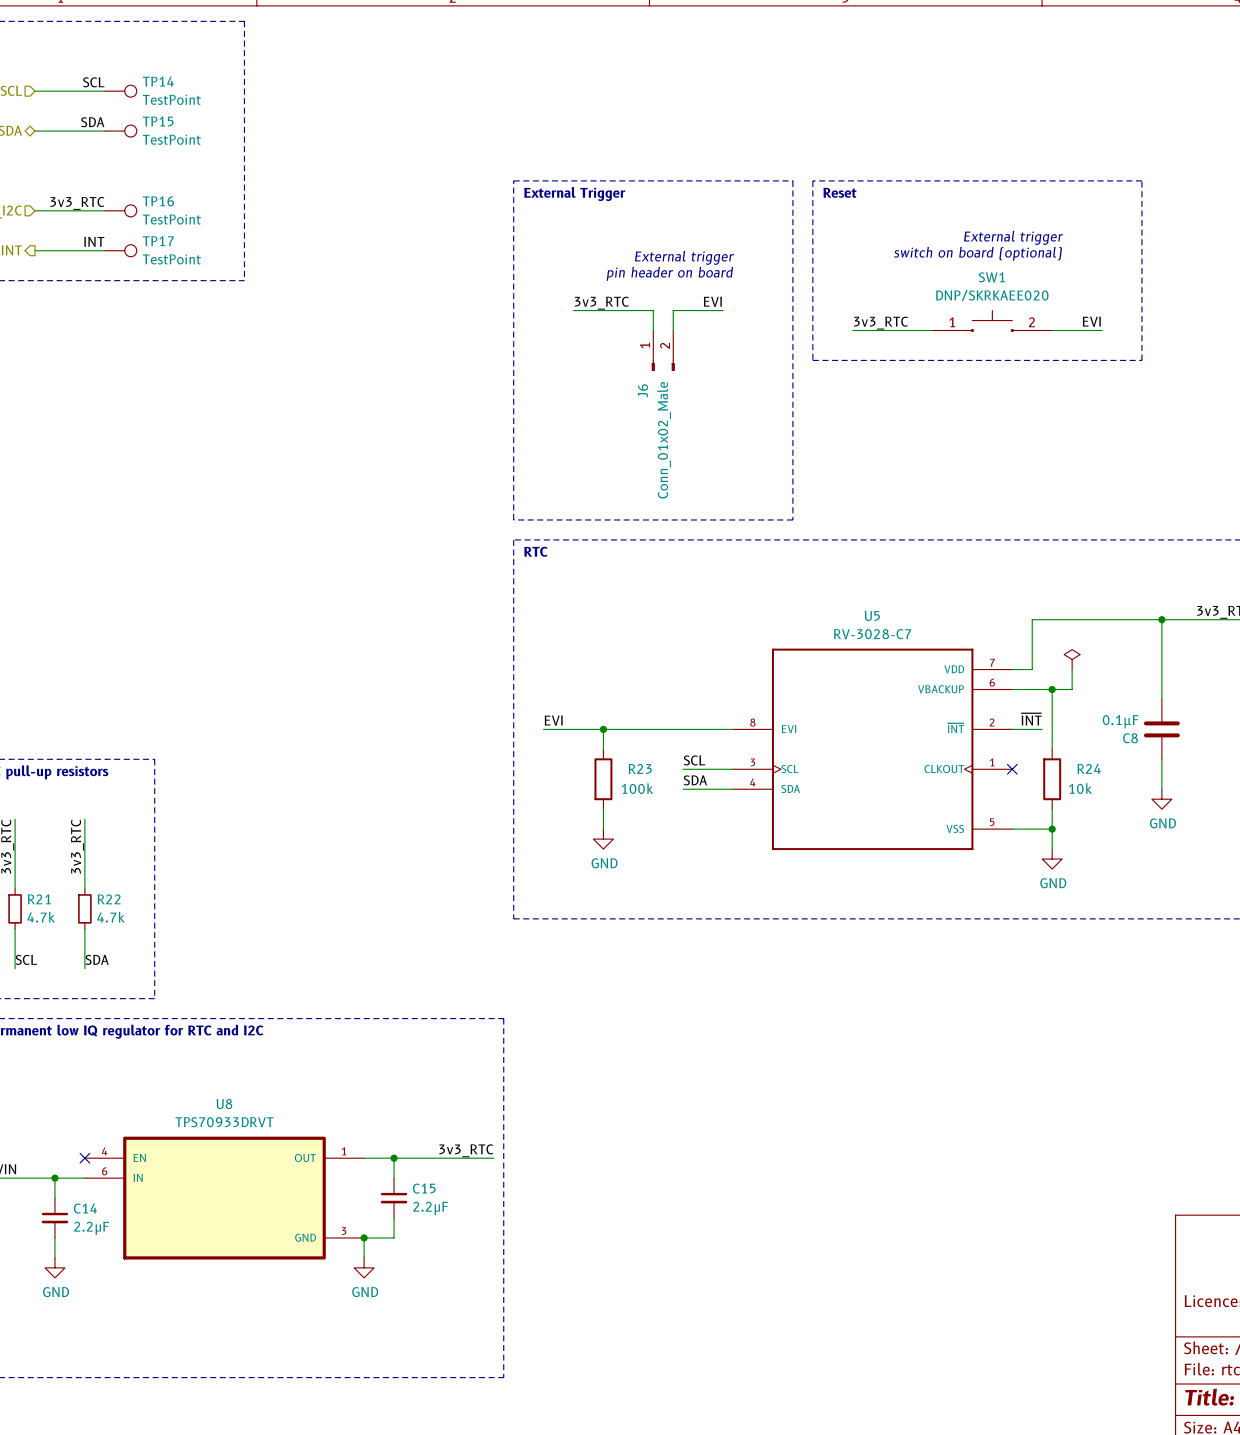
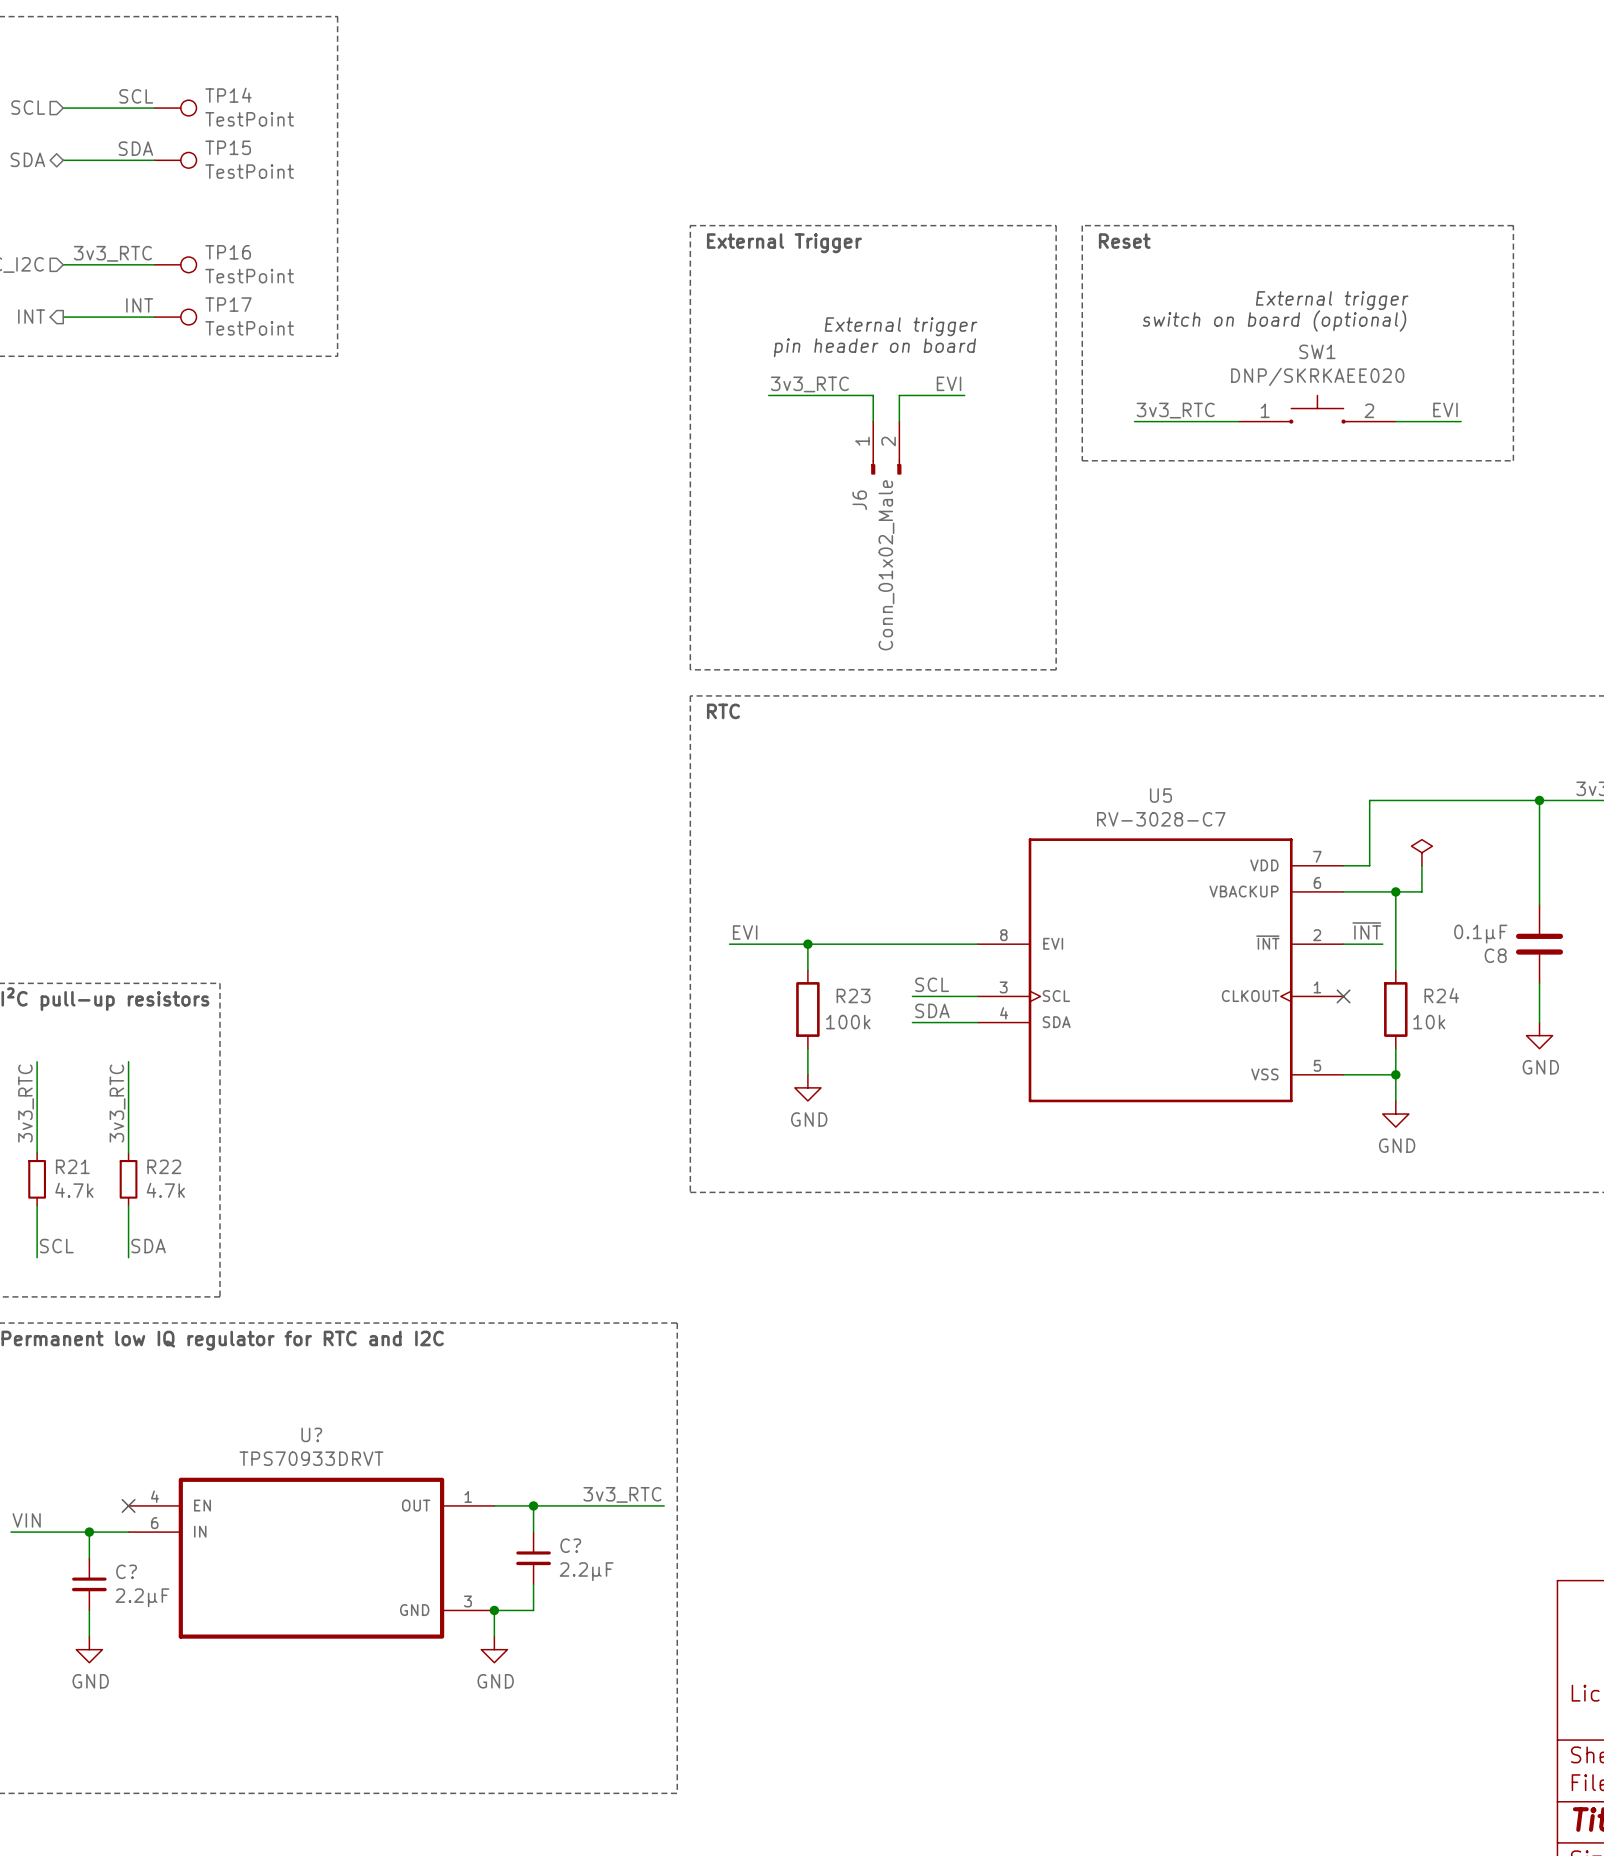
U8 name: U8 (224, 1104) -> U? (311, 1434)
C15 name: C15 (424, 1188) -> C? (570, 1545)
C14 name: C14 (85, 1208) -> C? (126, 1571)

